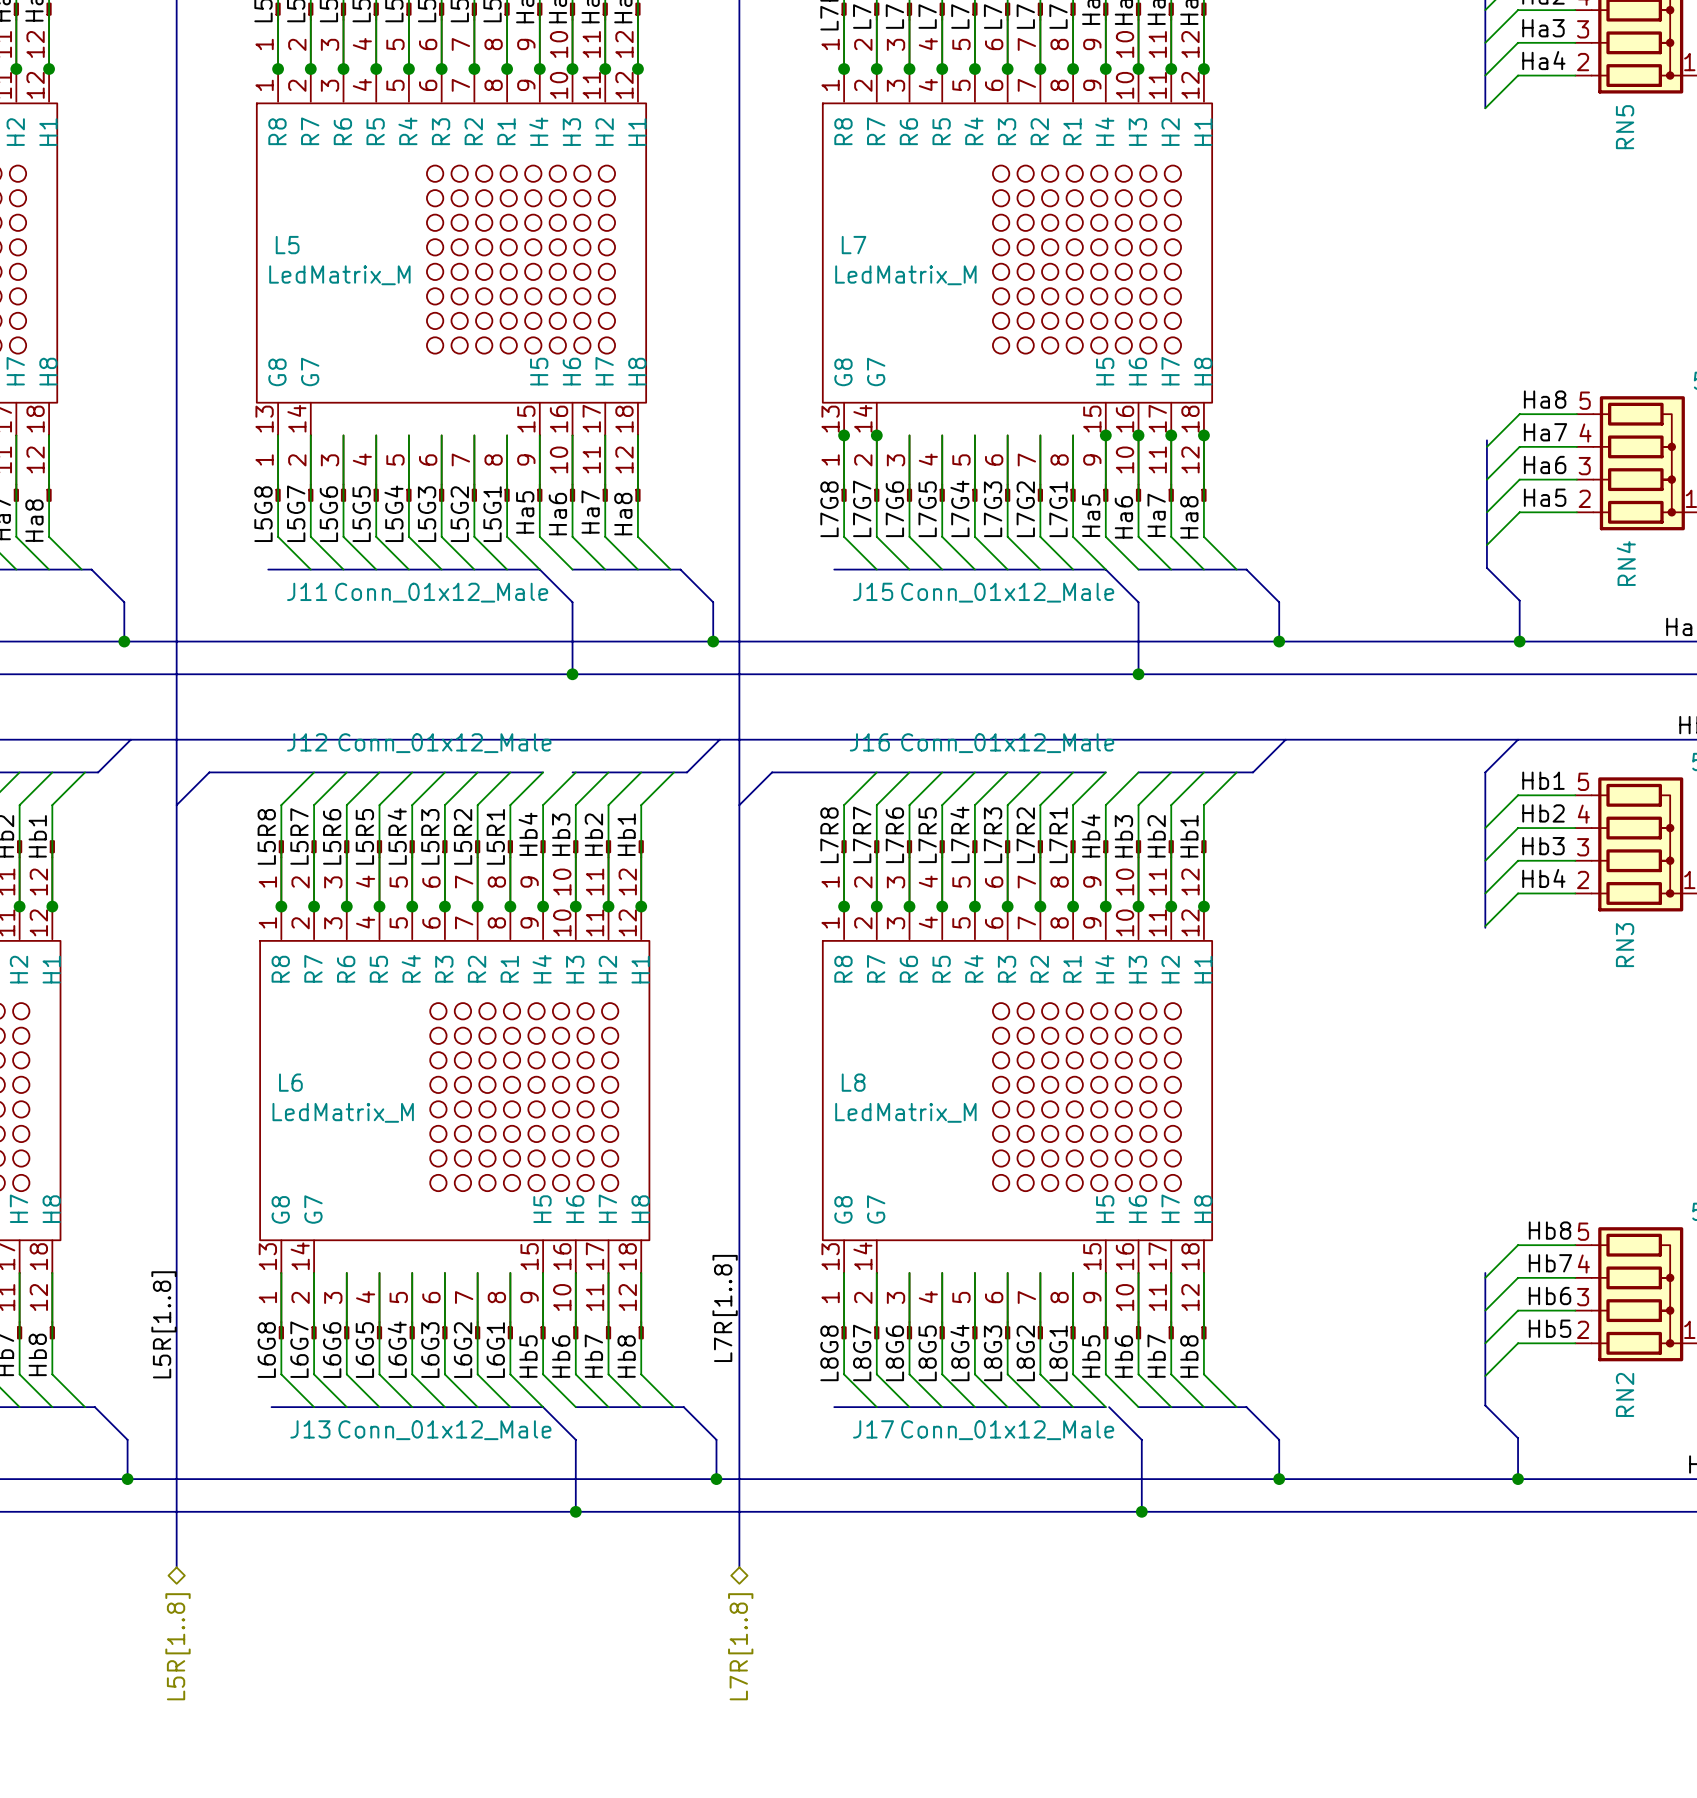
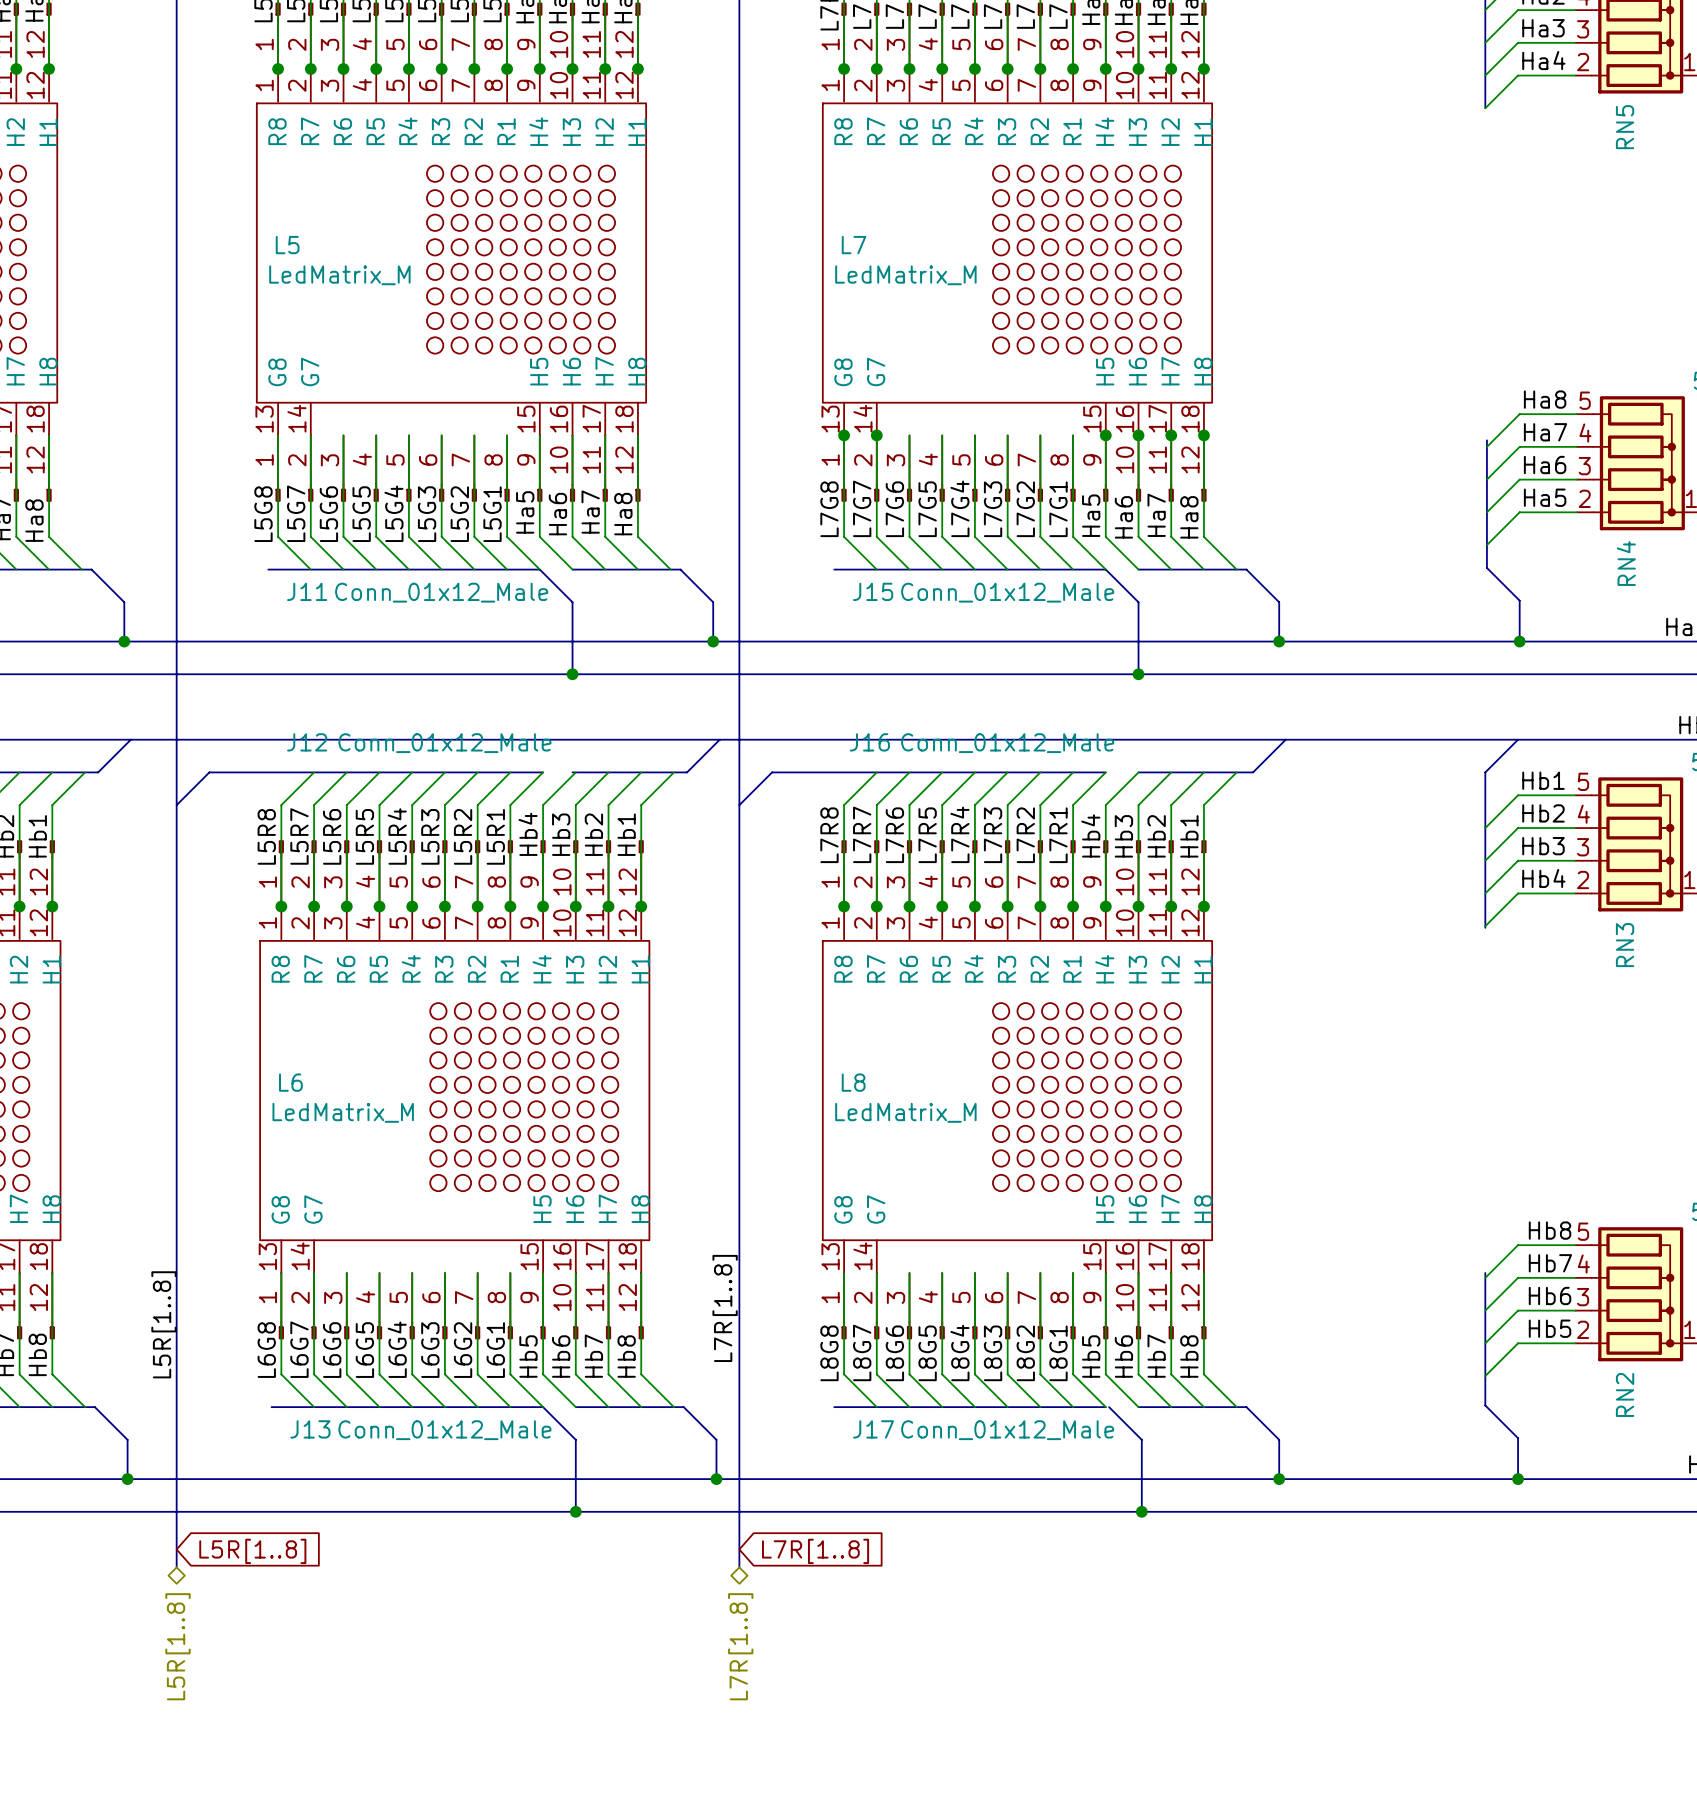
global label: none -> L5R[1..8] (252, 1551)
global label: none -> L7R[1..8] (815, 1551)

